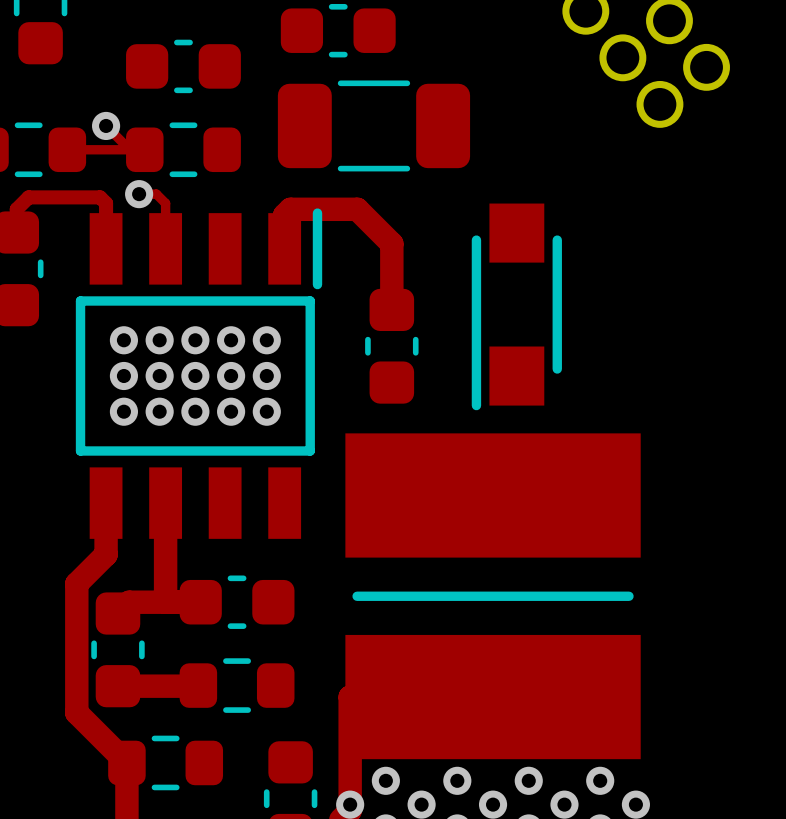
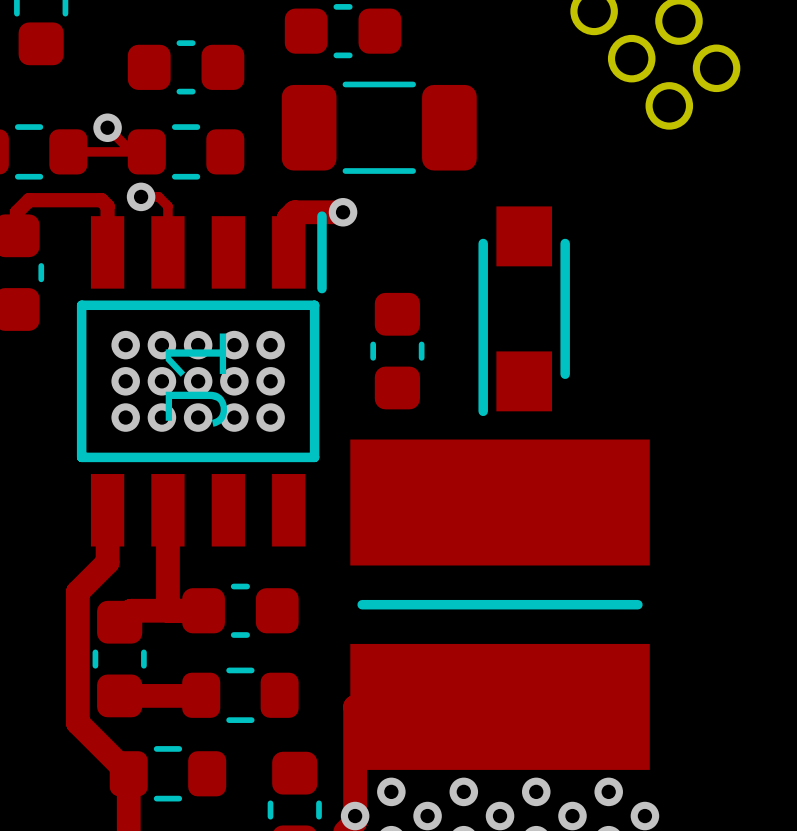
track: (338, 209) (357, 209) (391, 243) (391, 309) -> none
via: none -> (343, 212)
J1 name: none -> J1 (196, 380)

